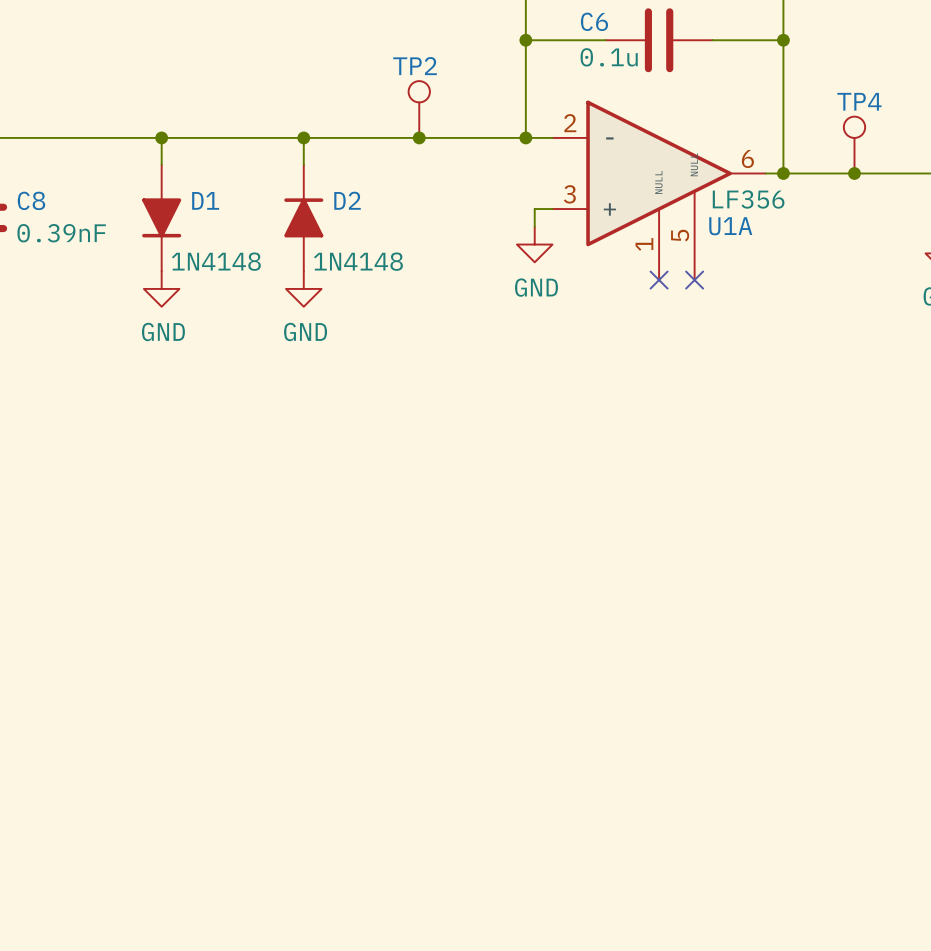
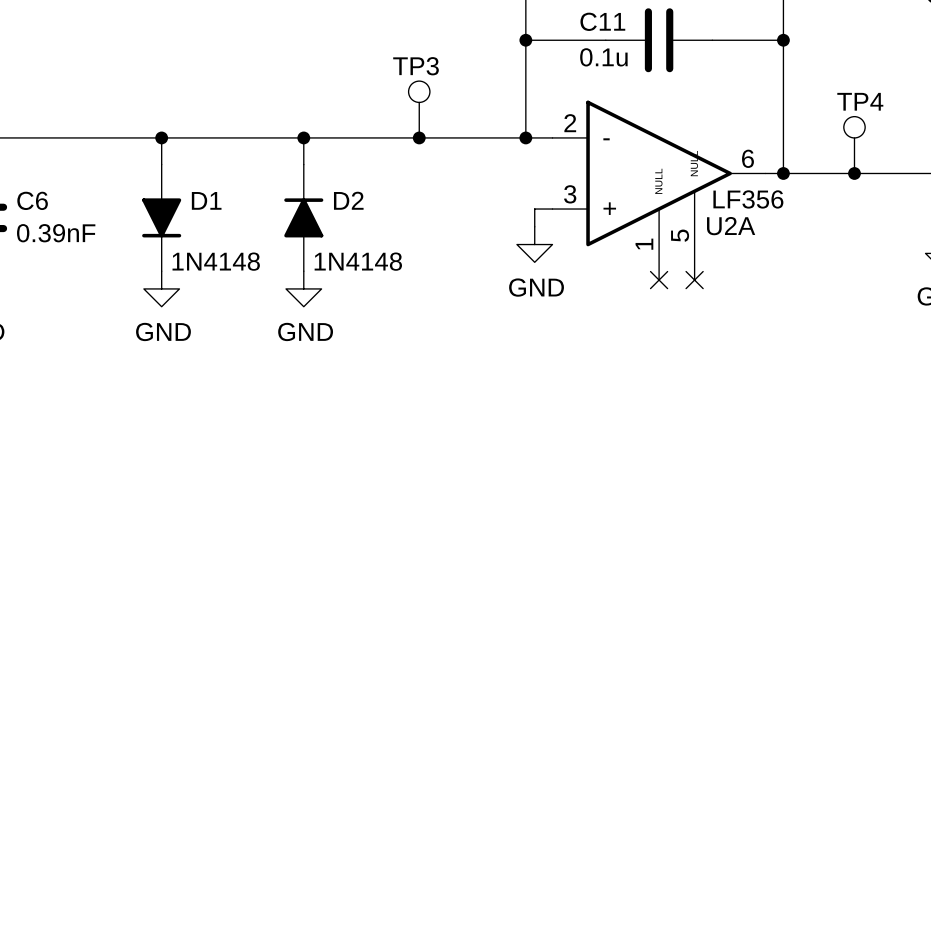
C6 name: C6 (594, 21) -> C11 (602, 21)
TP2 name: TP2 (415, 66) -> TP3 (416, 66)
C8 name: C8 (31, 200) -> C6 (32, 200)
U1A name: U1A (730, 226) -> U2A (731, 226)

